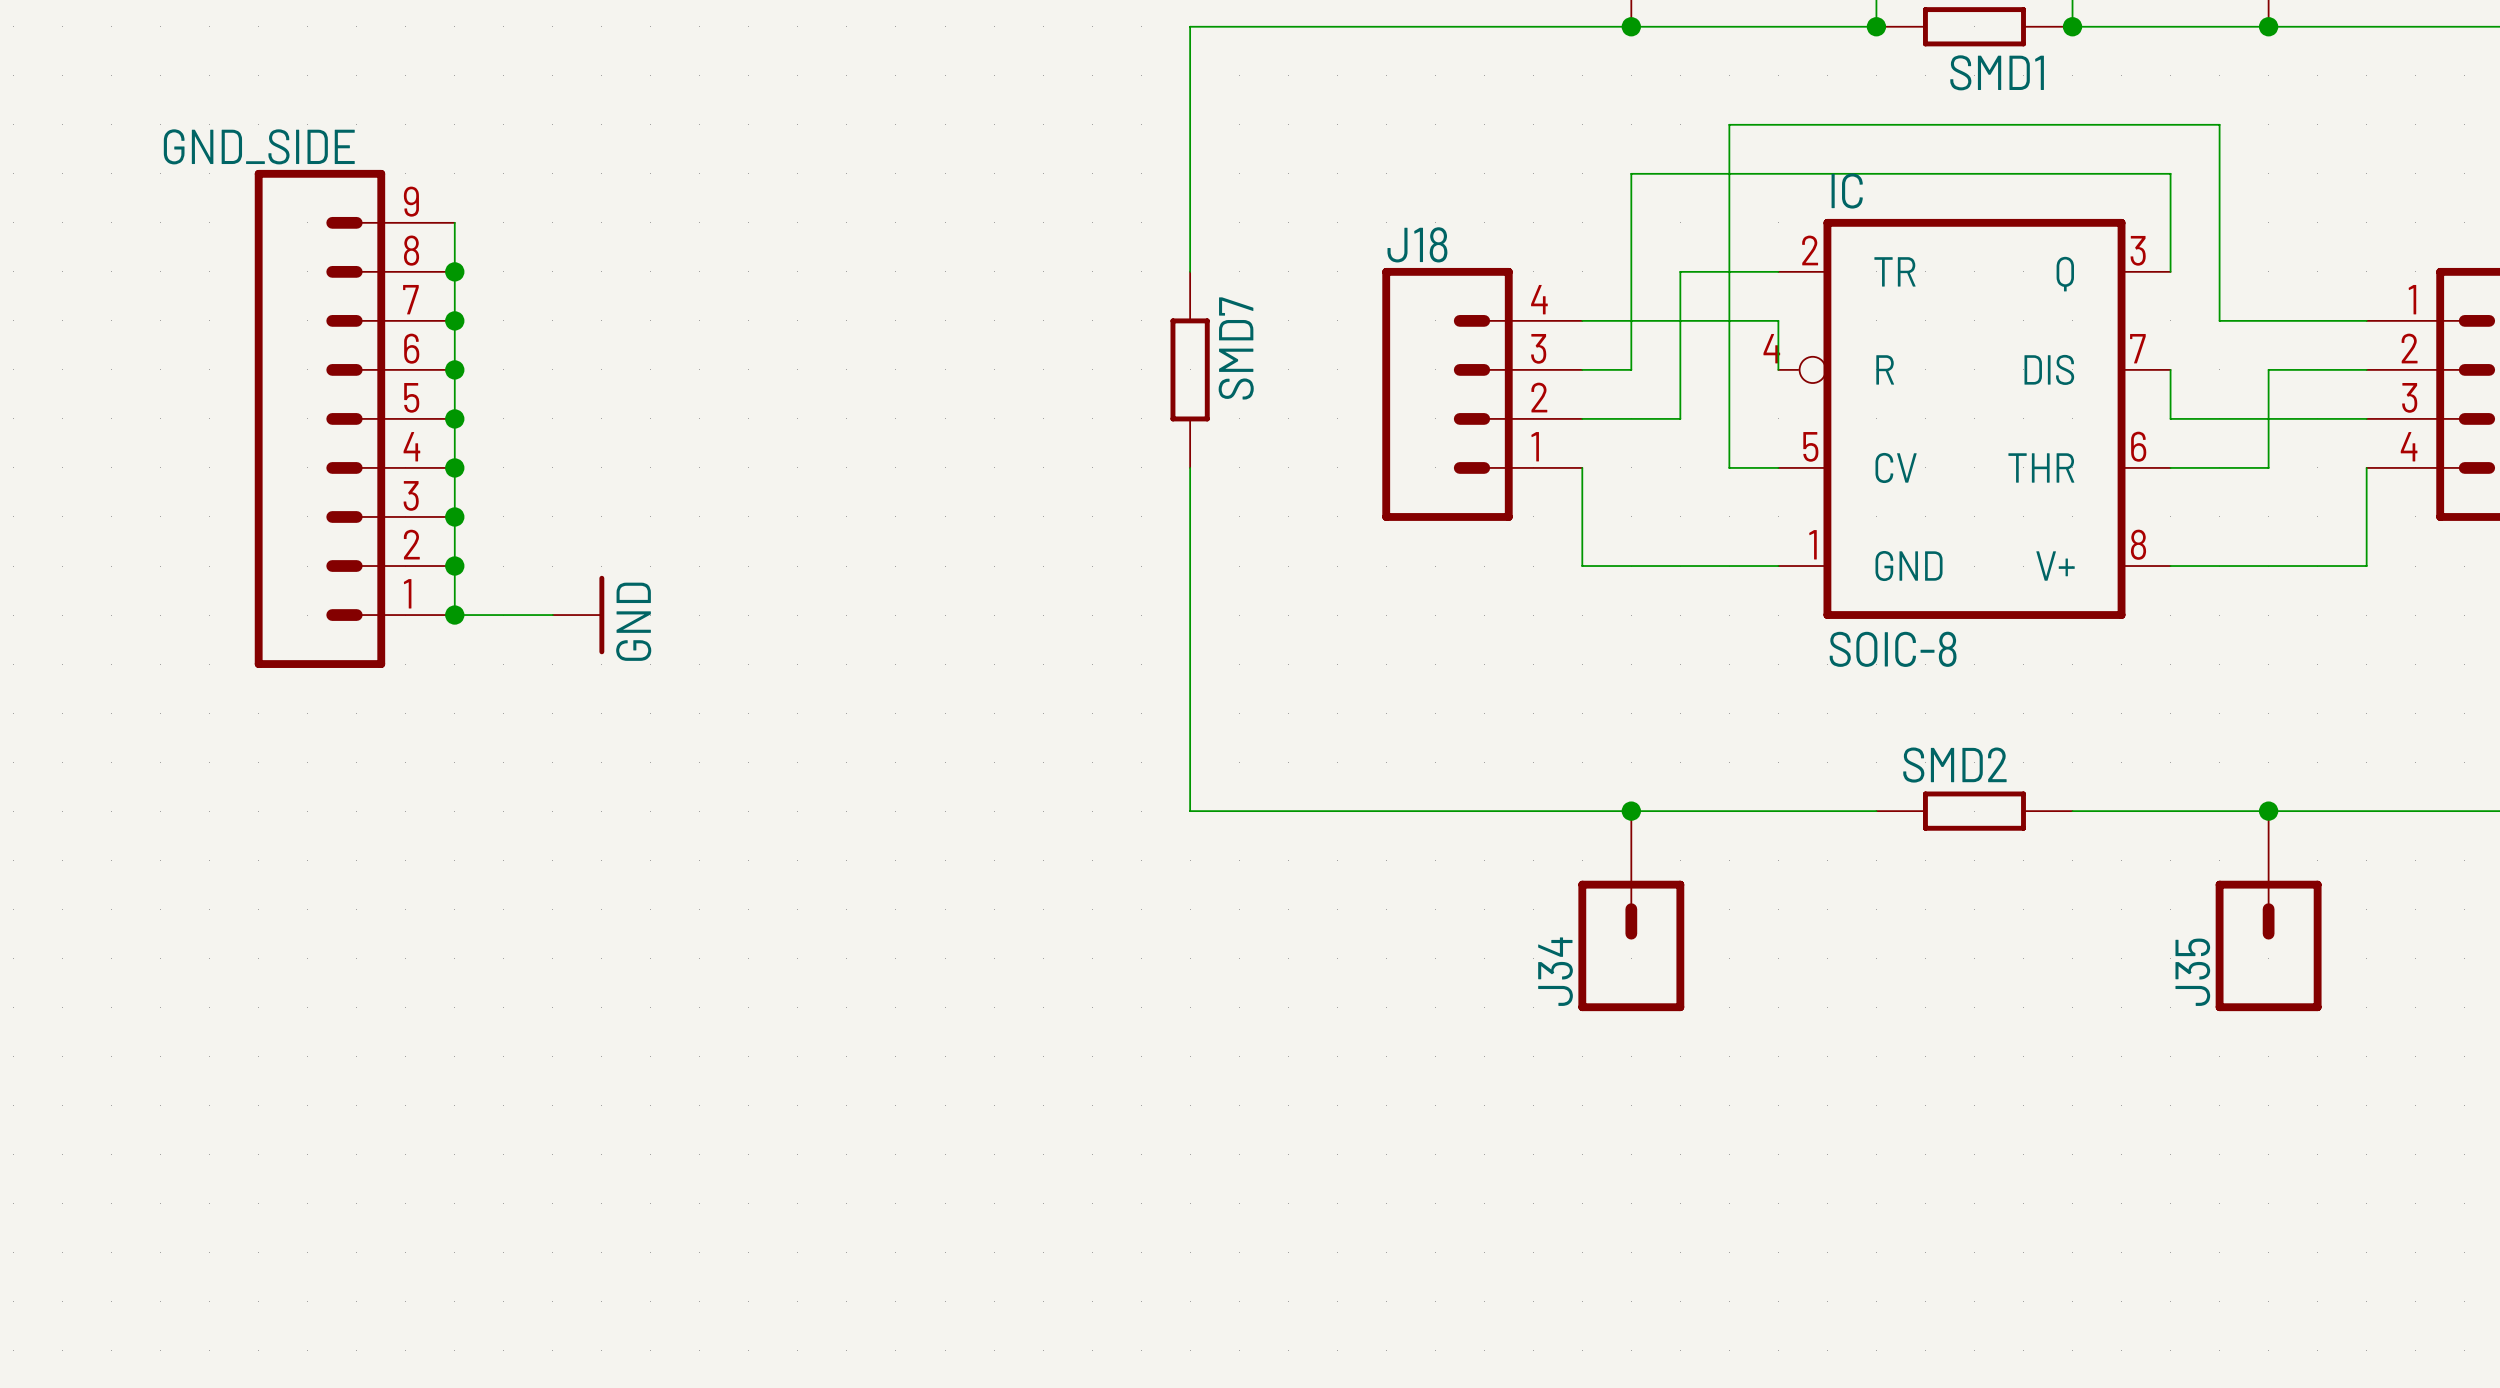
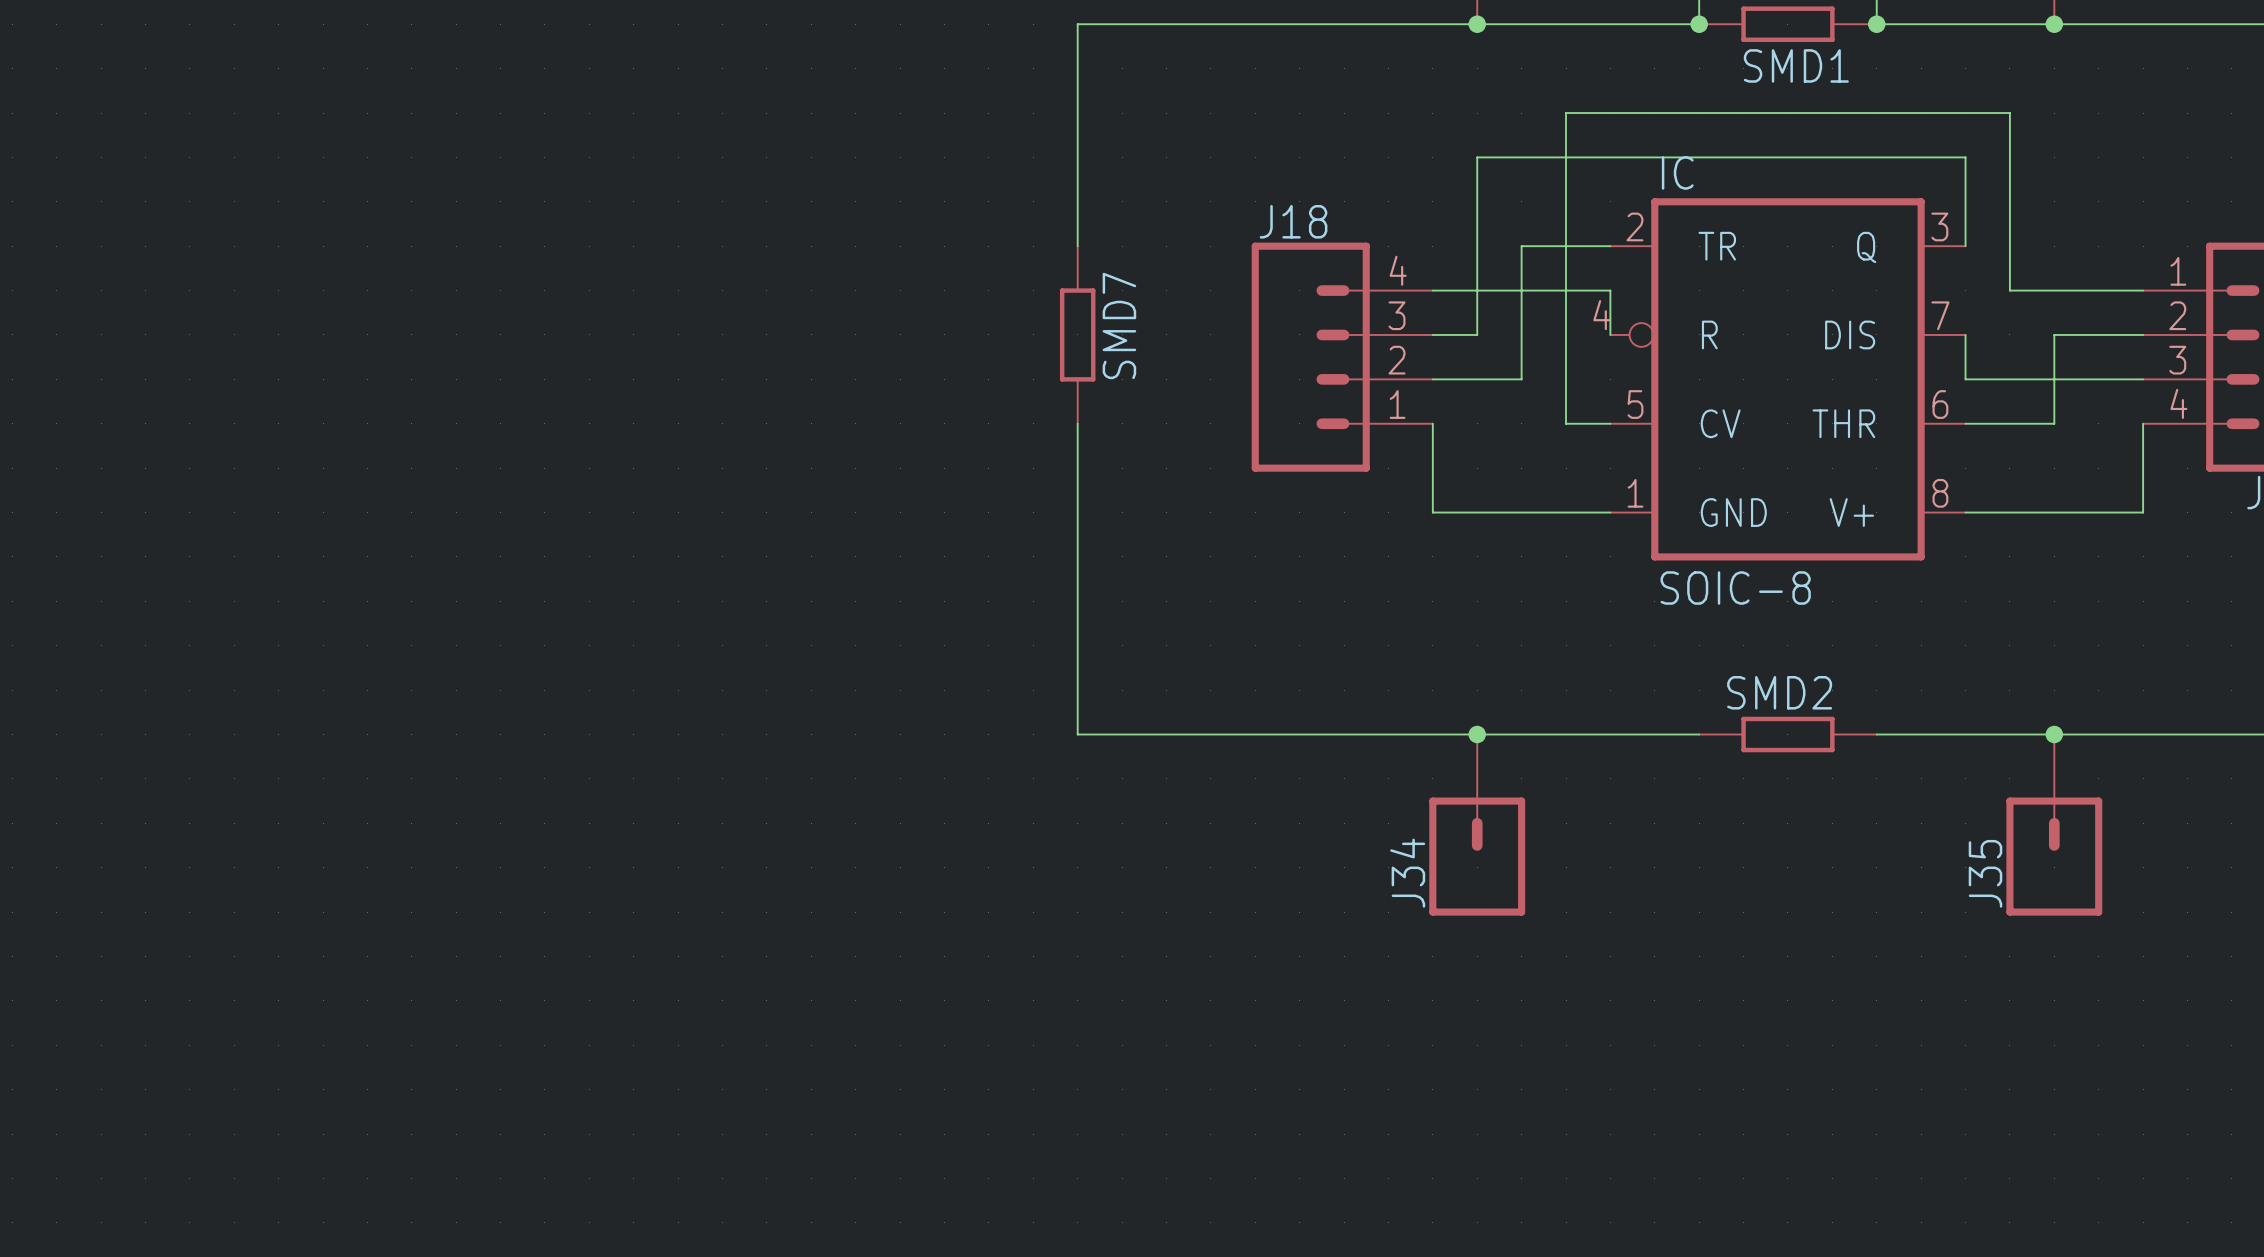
wire: (454, 222) (454, 615) (552, 615) -> none
junction: (454, 271) -> none
junction: (454, 320) -> none
junction: (454, 369) -> none
GND_SIDE: (354, 418) -> none
junction: (454, 418) -> none
junction: (454, 467) -> none
junction: (454, 516) -> none
junction: (454, 566) -> none
junction: (454, 615) -> none
power symbol: GND (578, 615) -> none

